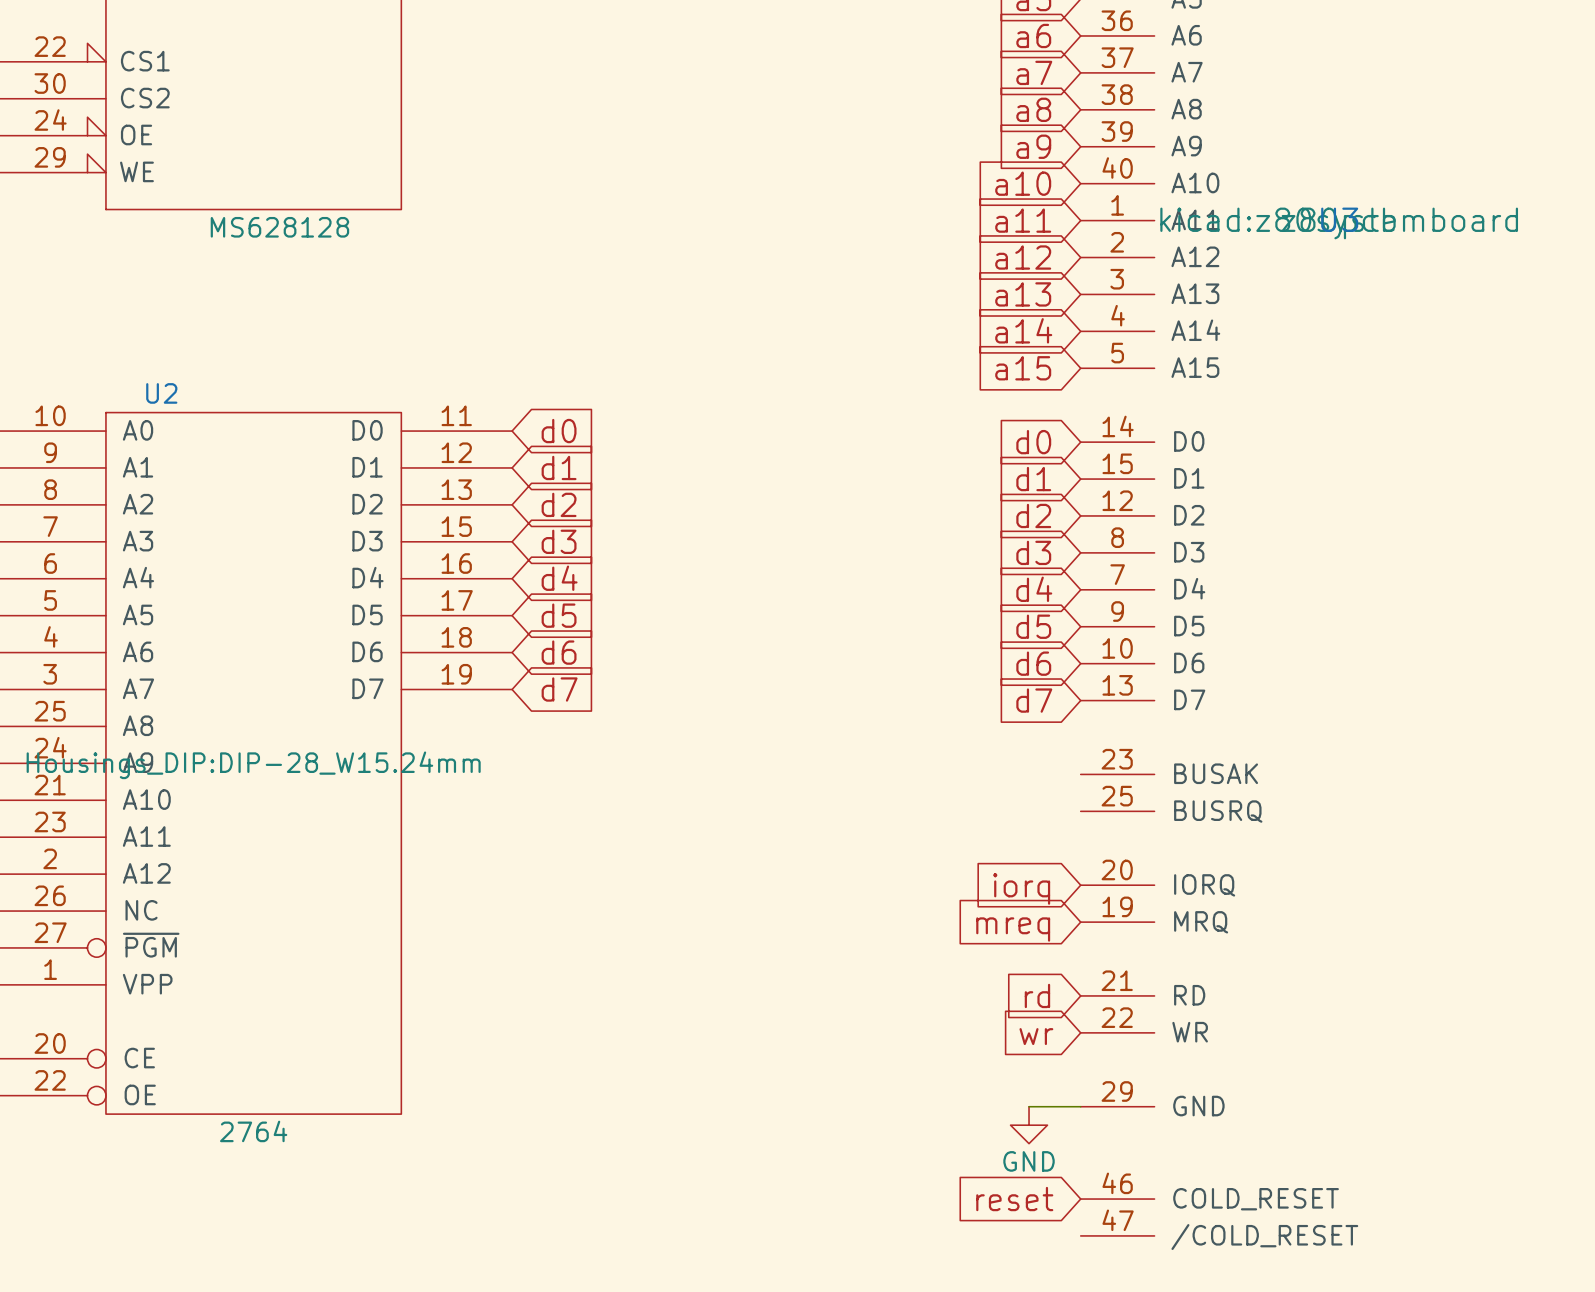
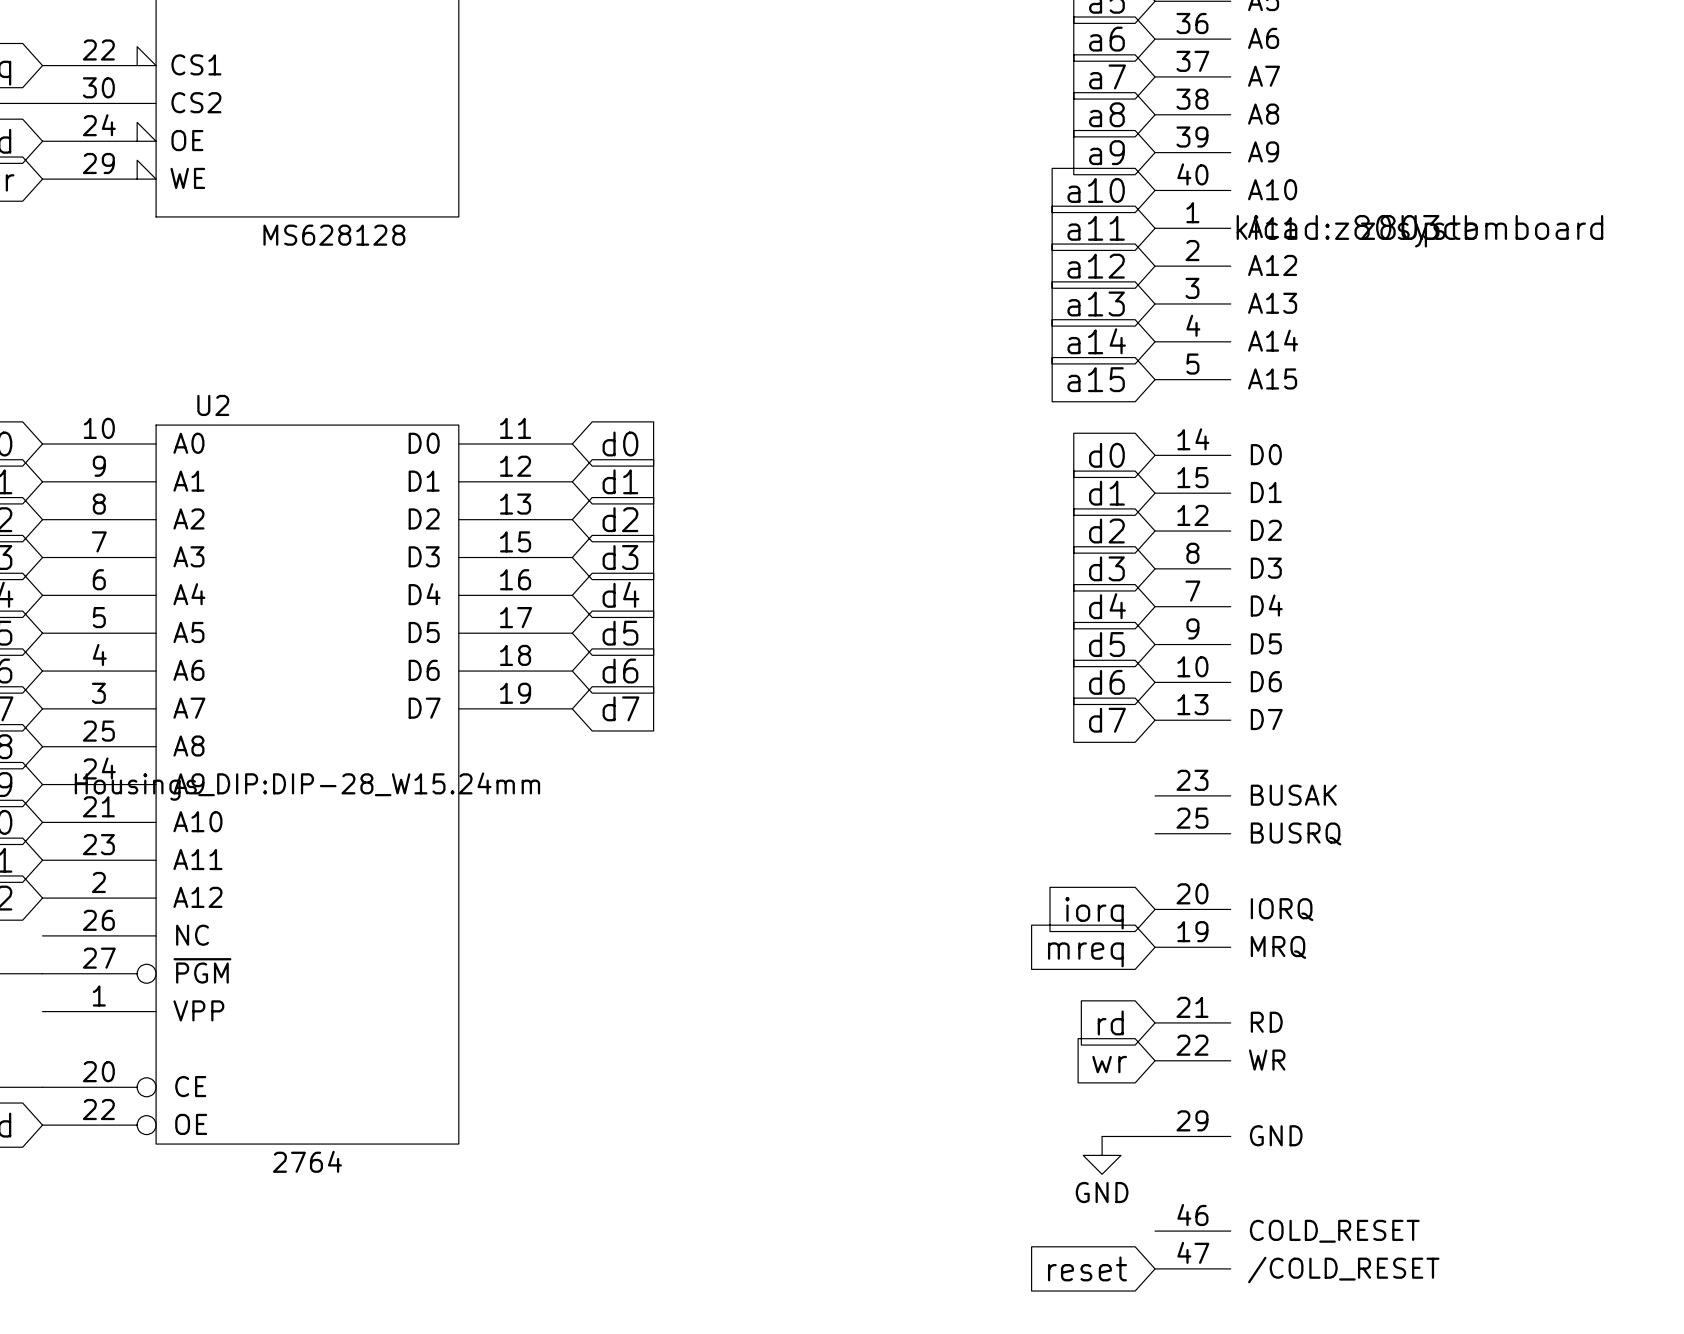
global label position: reset (1014, 1199) -> reset (1087, 1268)

